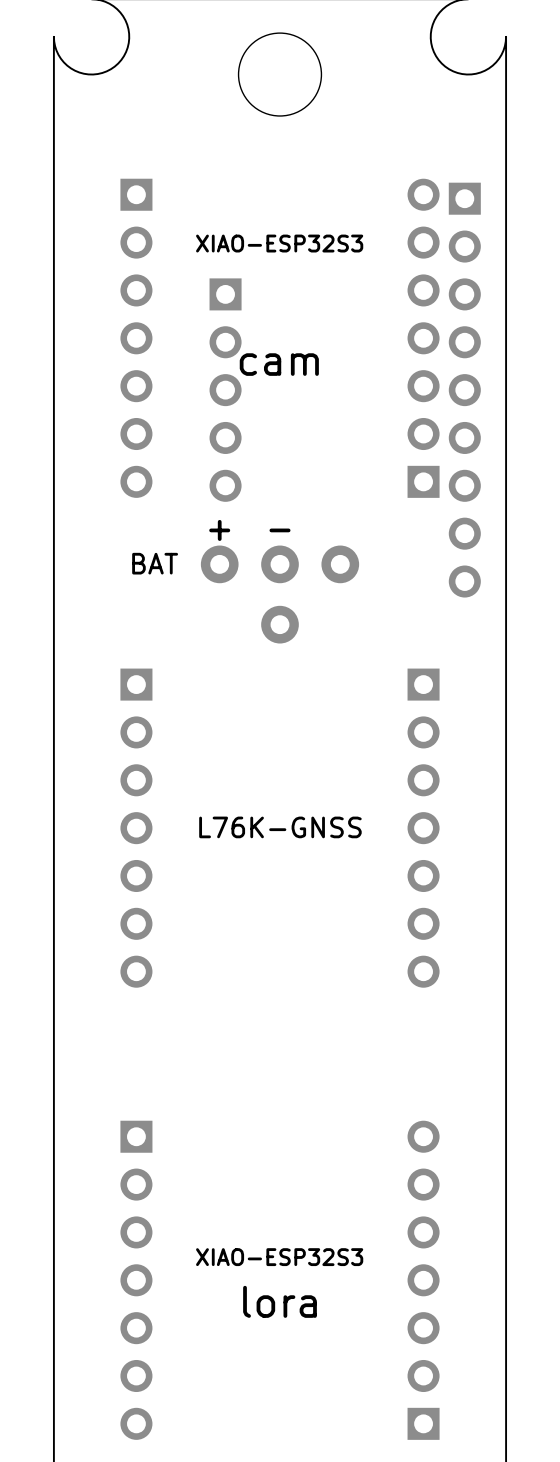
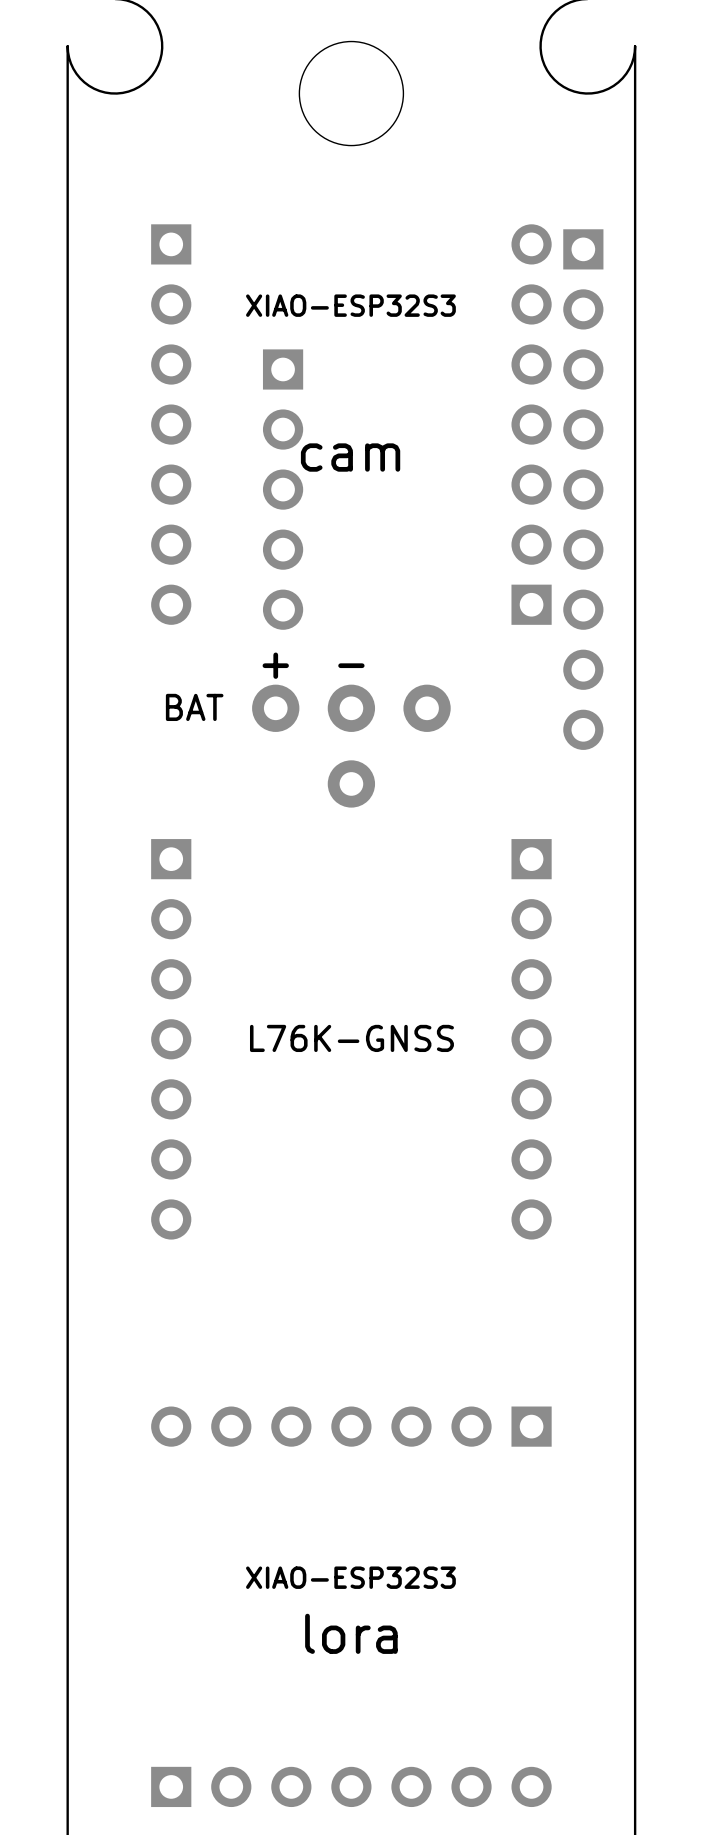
part: none -> (351, 1426)
part: (136, 1280) -> none
part: (423, 1280) -> none
part: none -> (351, 1786)

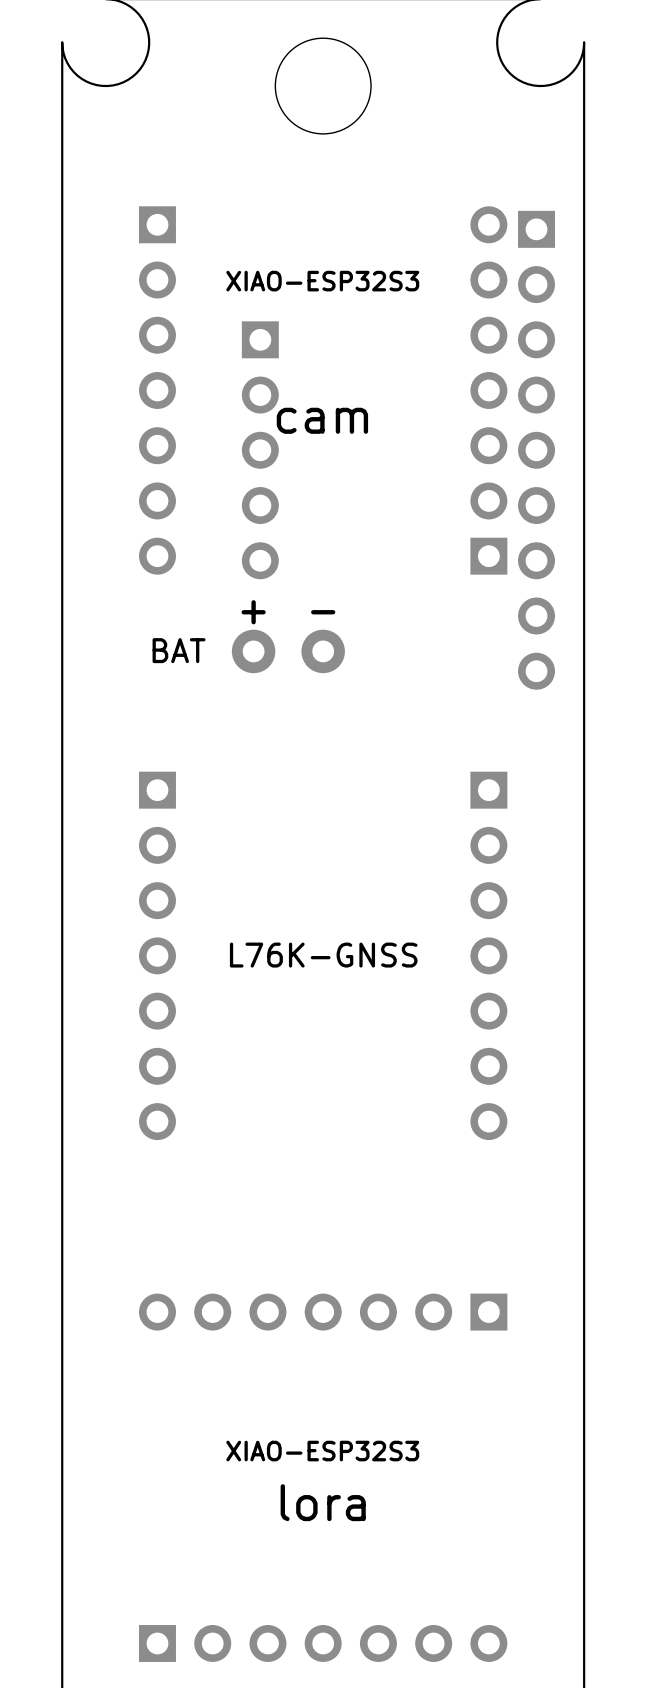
part: (427, 708) -> none
part: (351, 783) -> none

